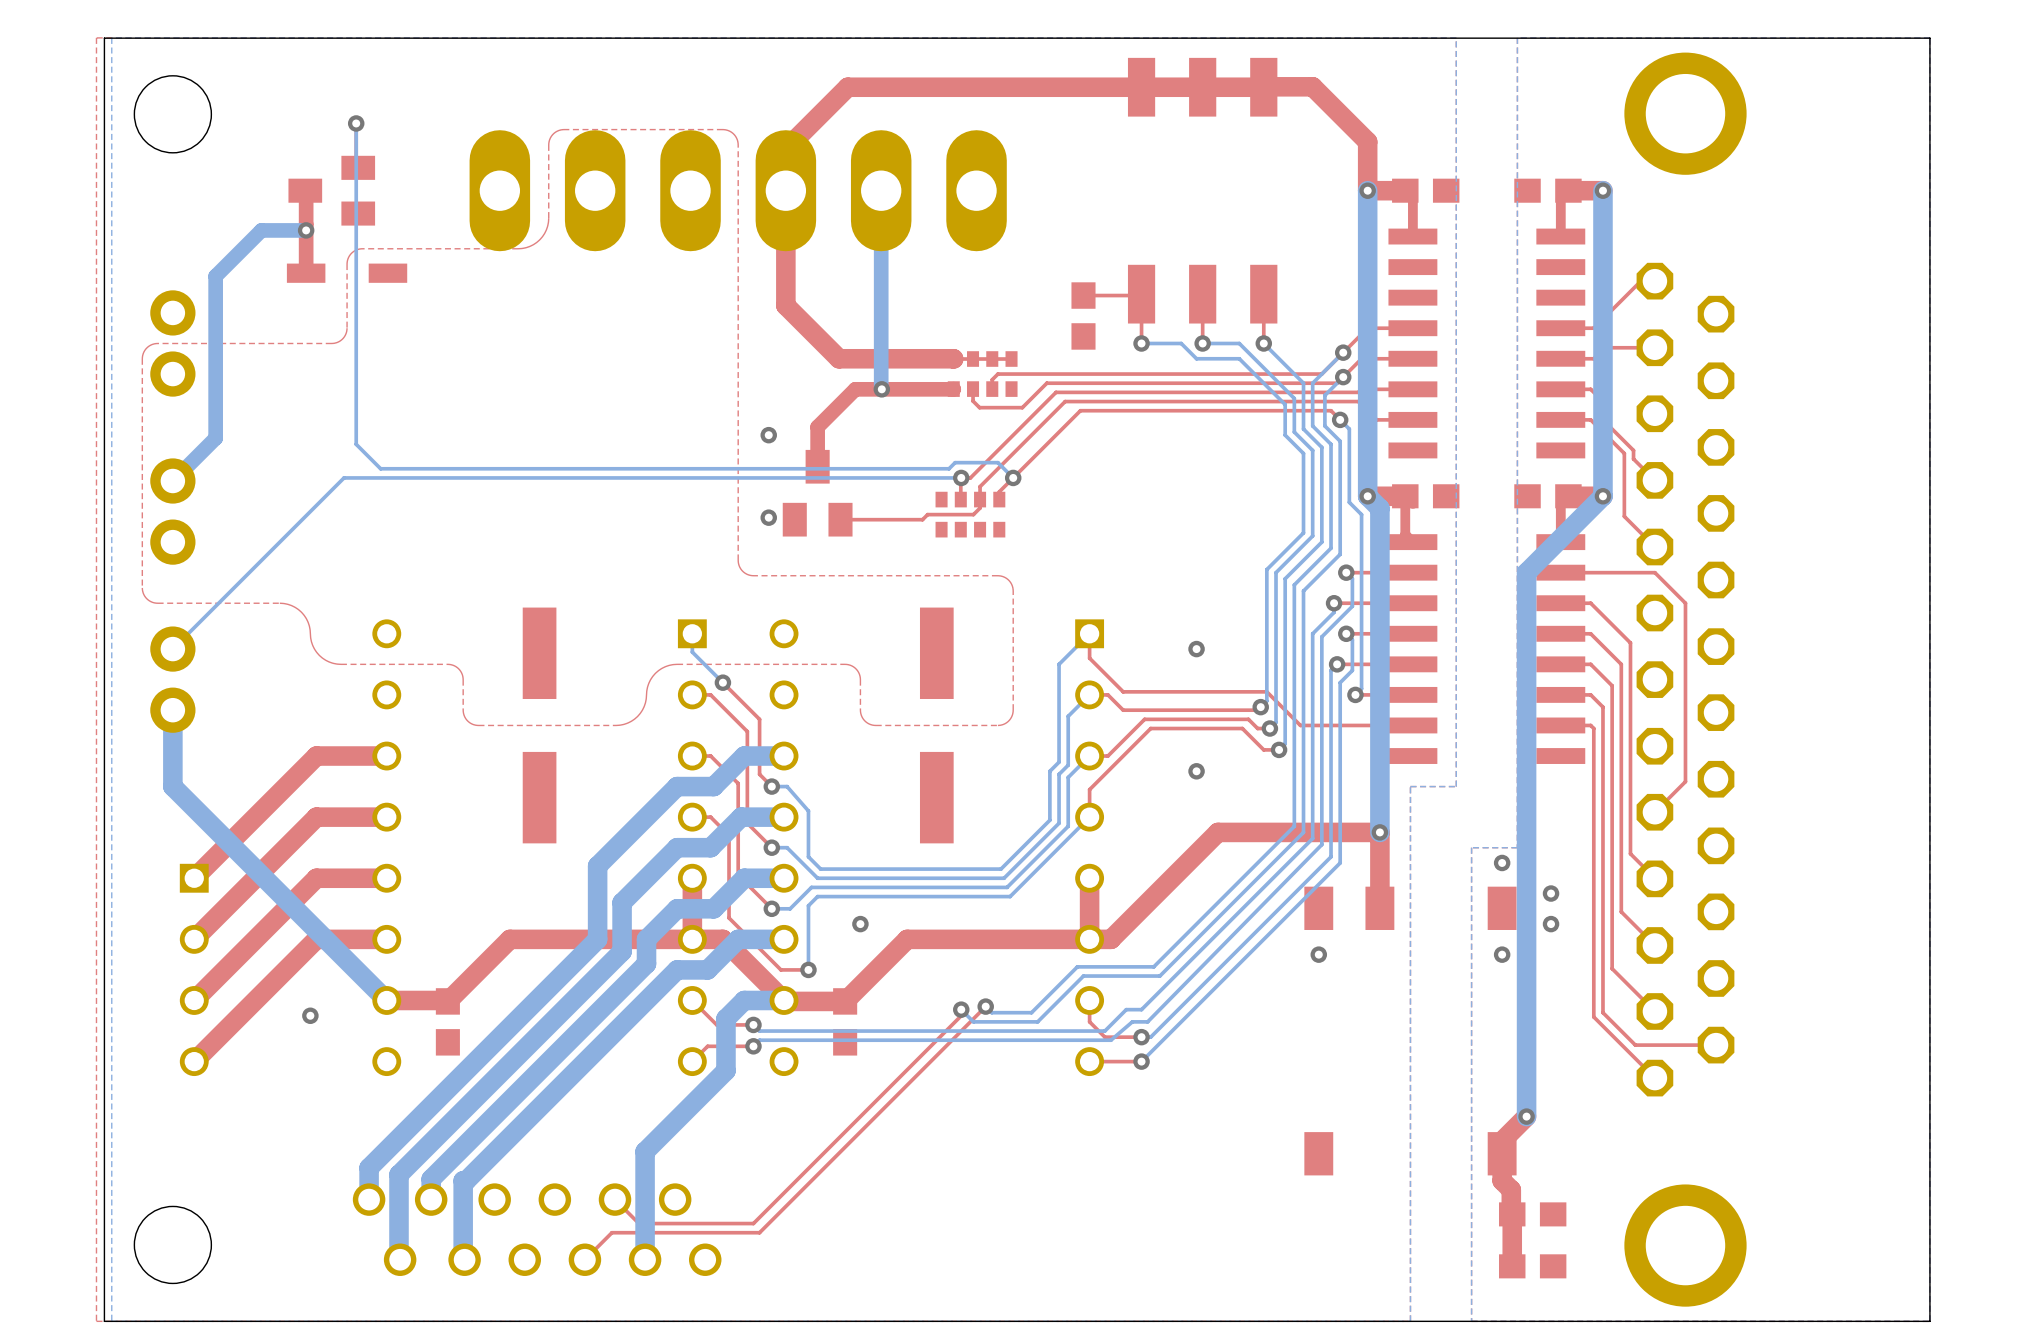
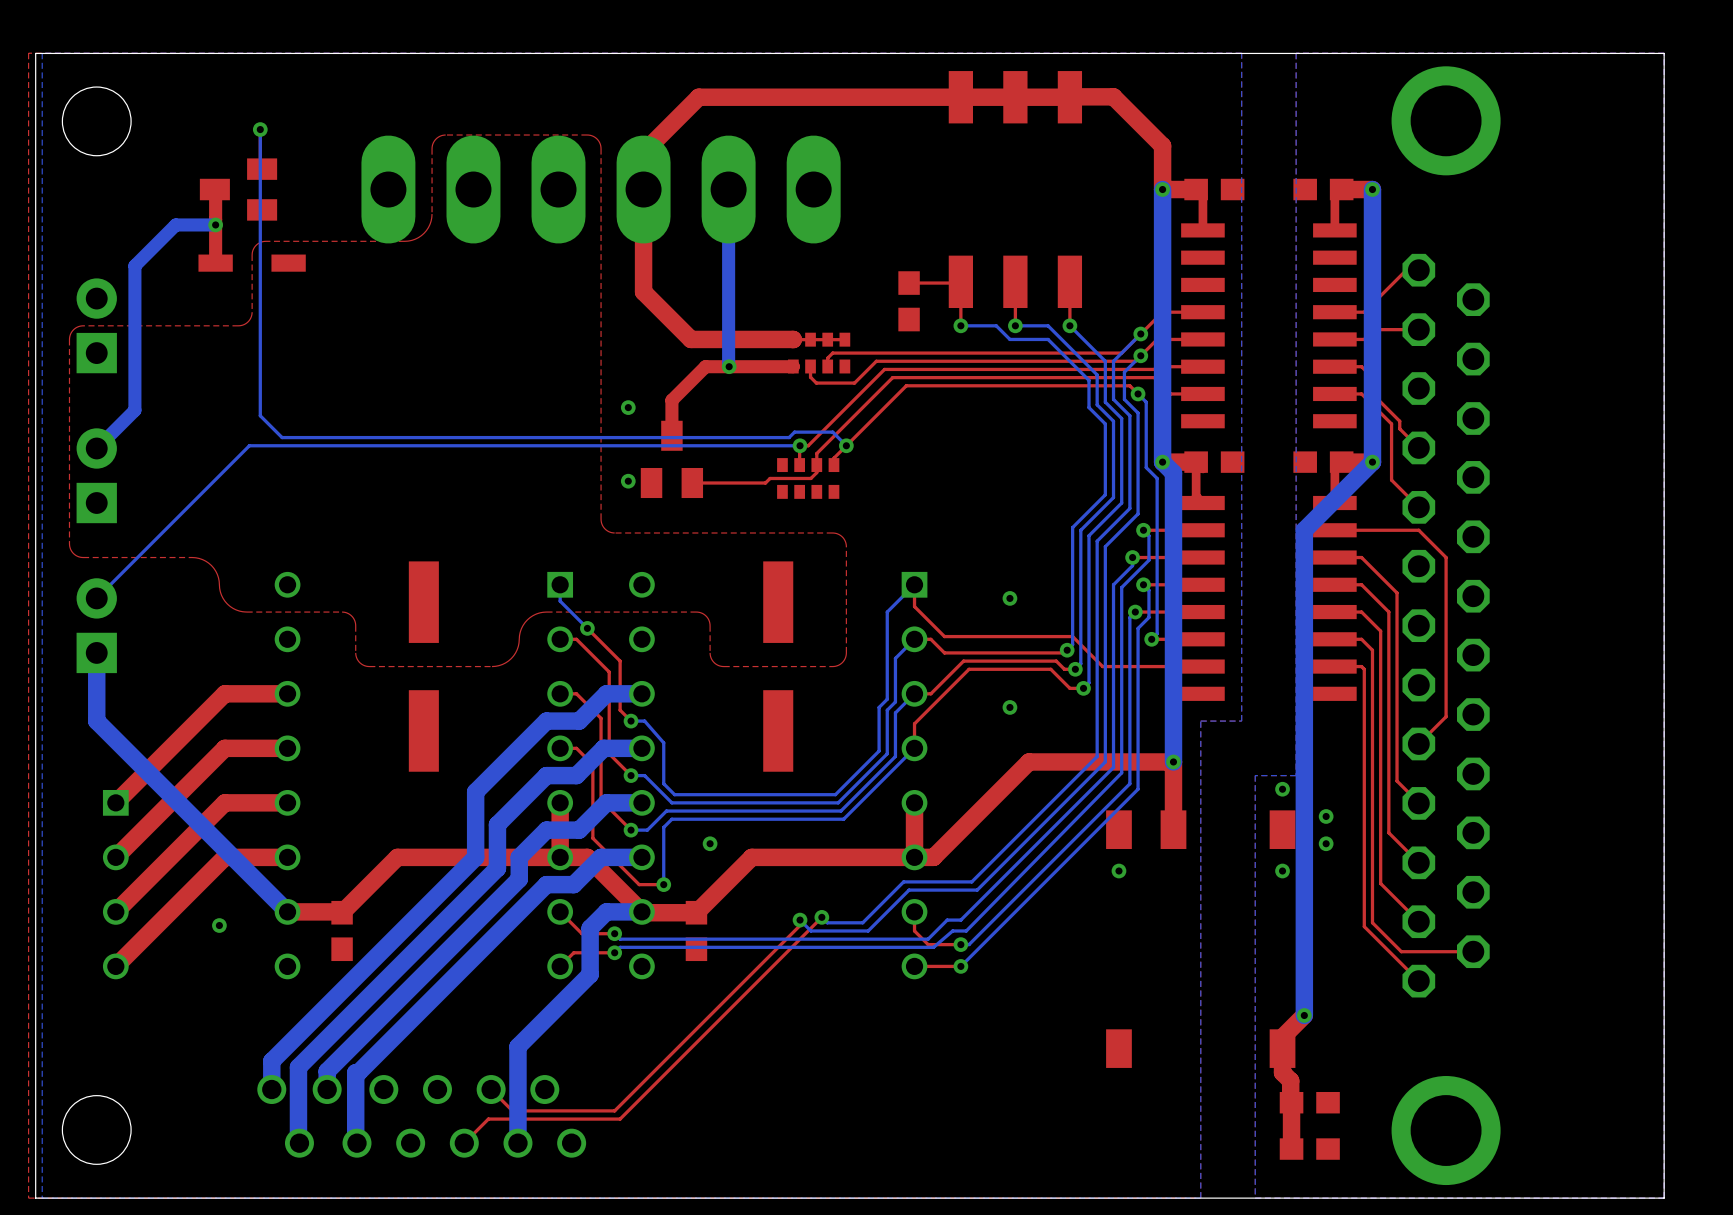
part footprint: [150, 290, 196, 397] -> [76, 278, 117, 374]
part footprint: [150, 458, 196, 565] -> [76, 428, 117, 524]
part footprint: [150, 626, 196, 733] -> [76, 578, 117, 674]

